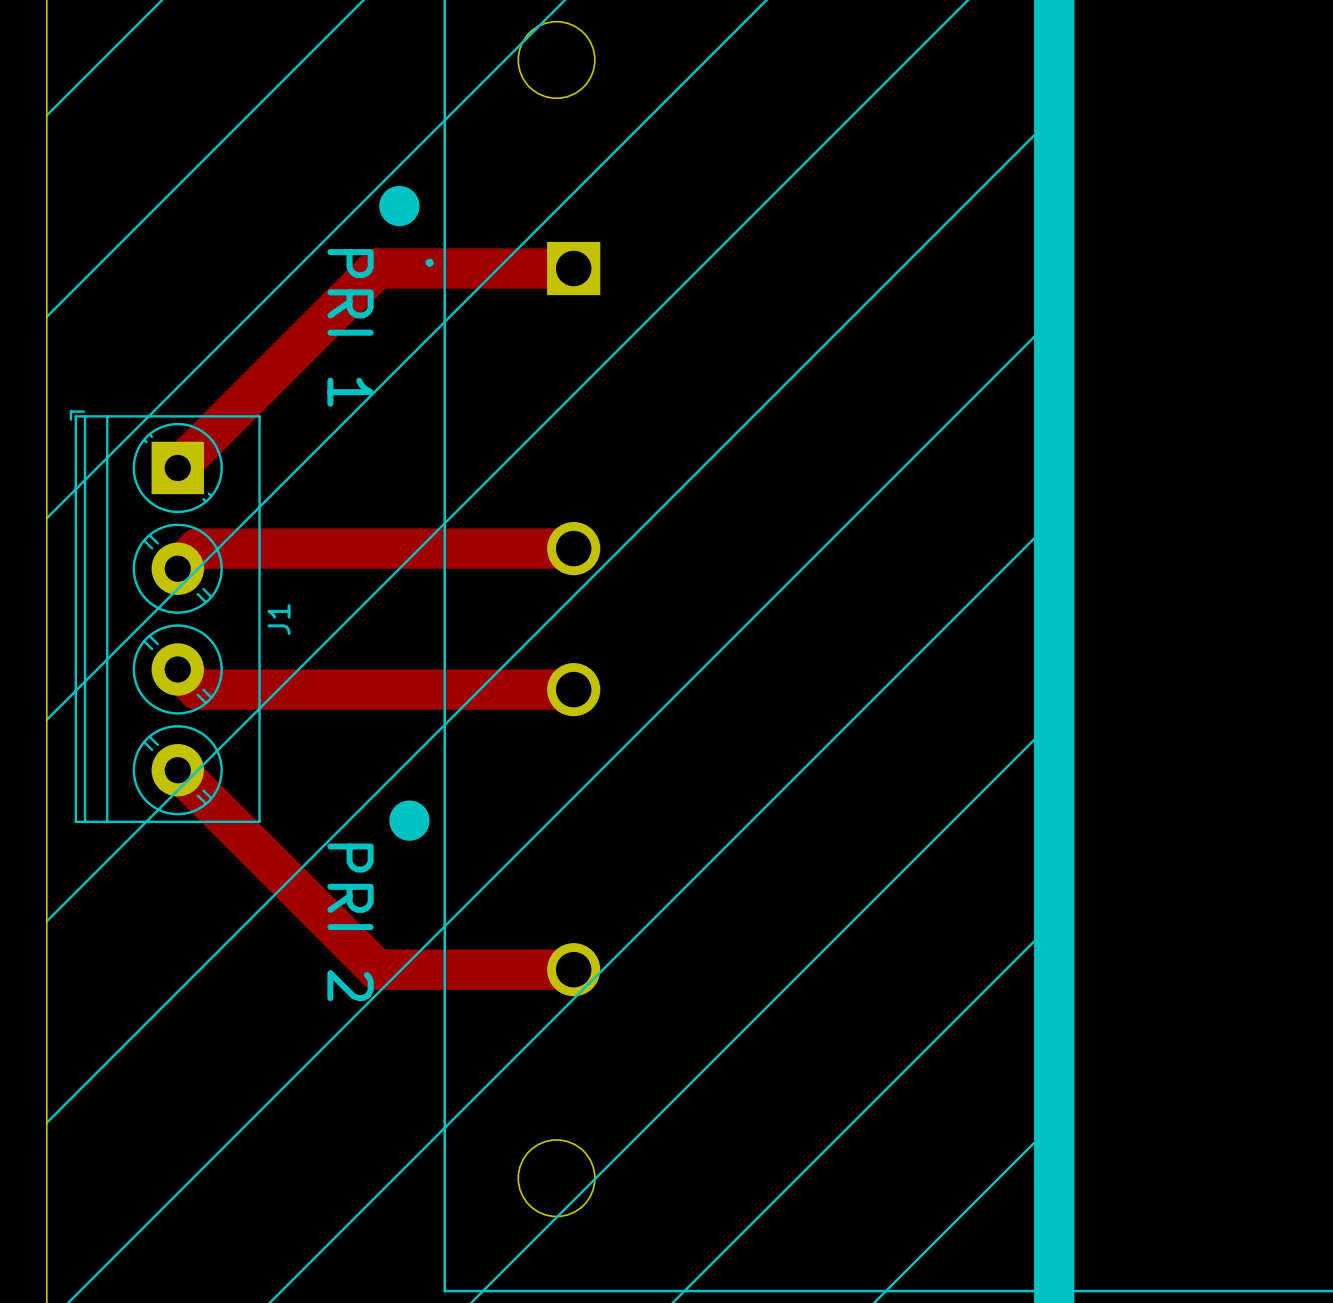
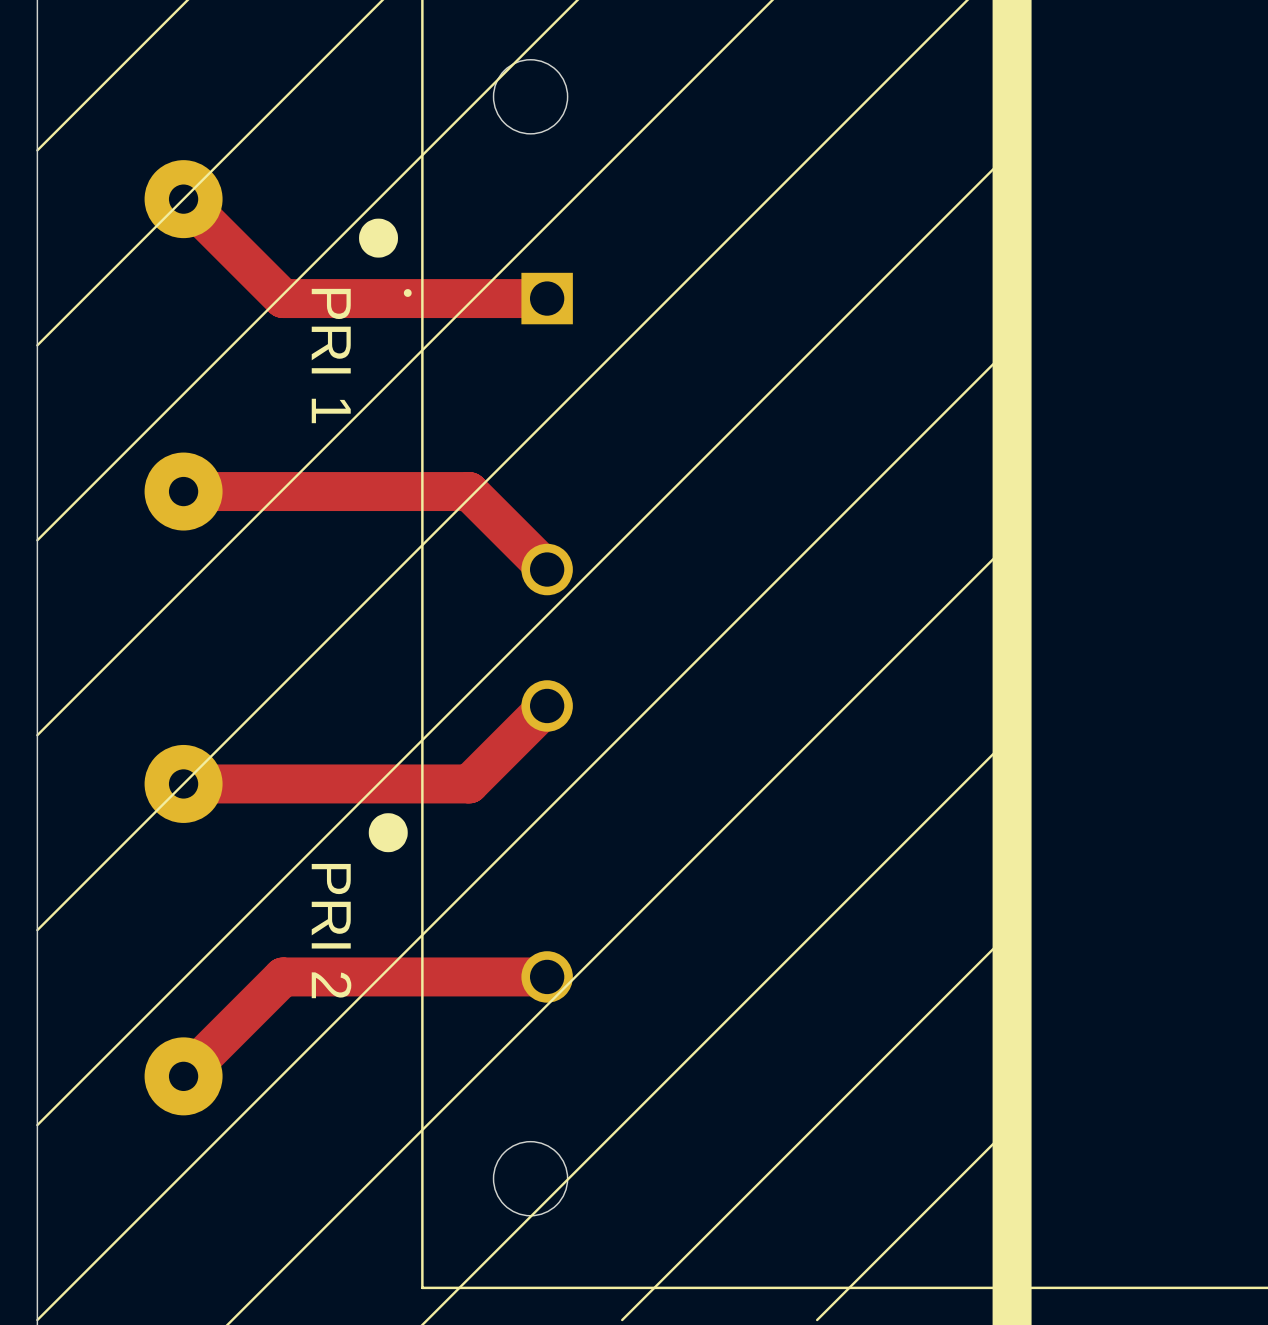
part: none -> (183, 199)
track: (377, 268) (177, 467) -> (357, 298) (282, 298) (183, 199)
part: none -> (183, 491)
track: (573, 548) (197, 548) (177, 568) -> (547, 569) (469, 491) (183, 491)
J1: (165, 616) -> none
track: (177, 669) (197, 689) (573, 689) -> none
track: none -> (542, 710) (469, 783) (183, 783)
track: (177, 770) (377, 969) -> (183, 1076) (282, 976) (357, 976)
part: none -> (183, 783)
part: none -> (183, 1076)

